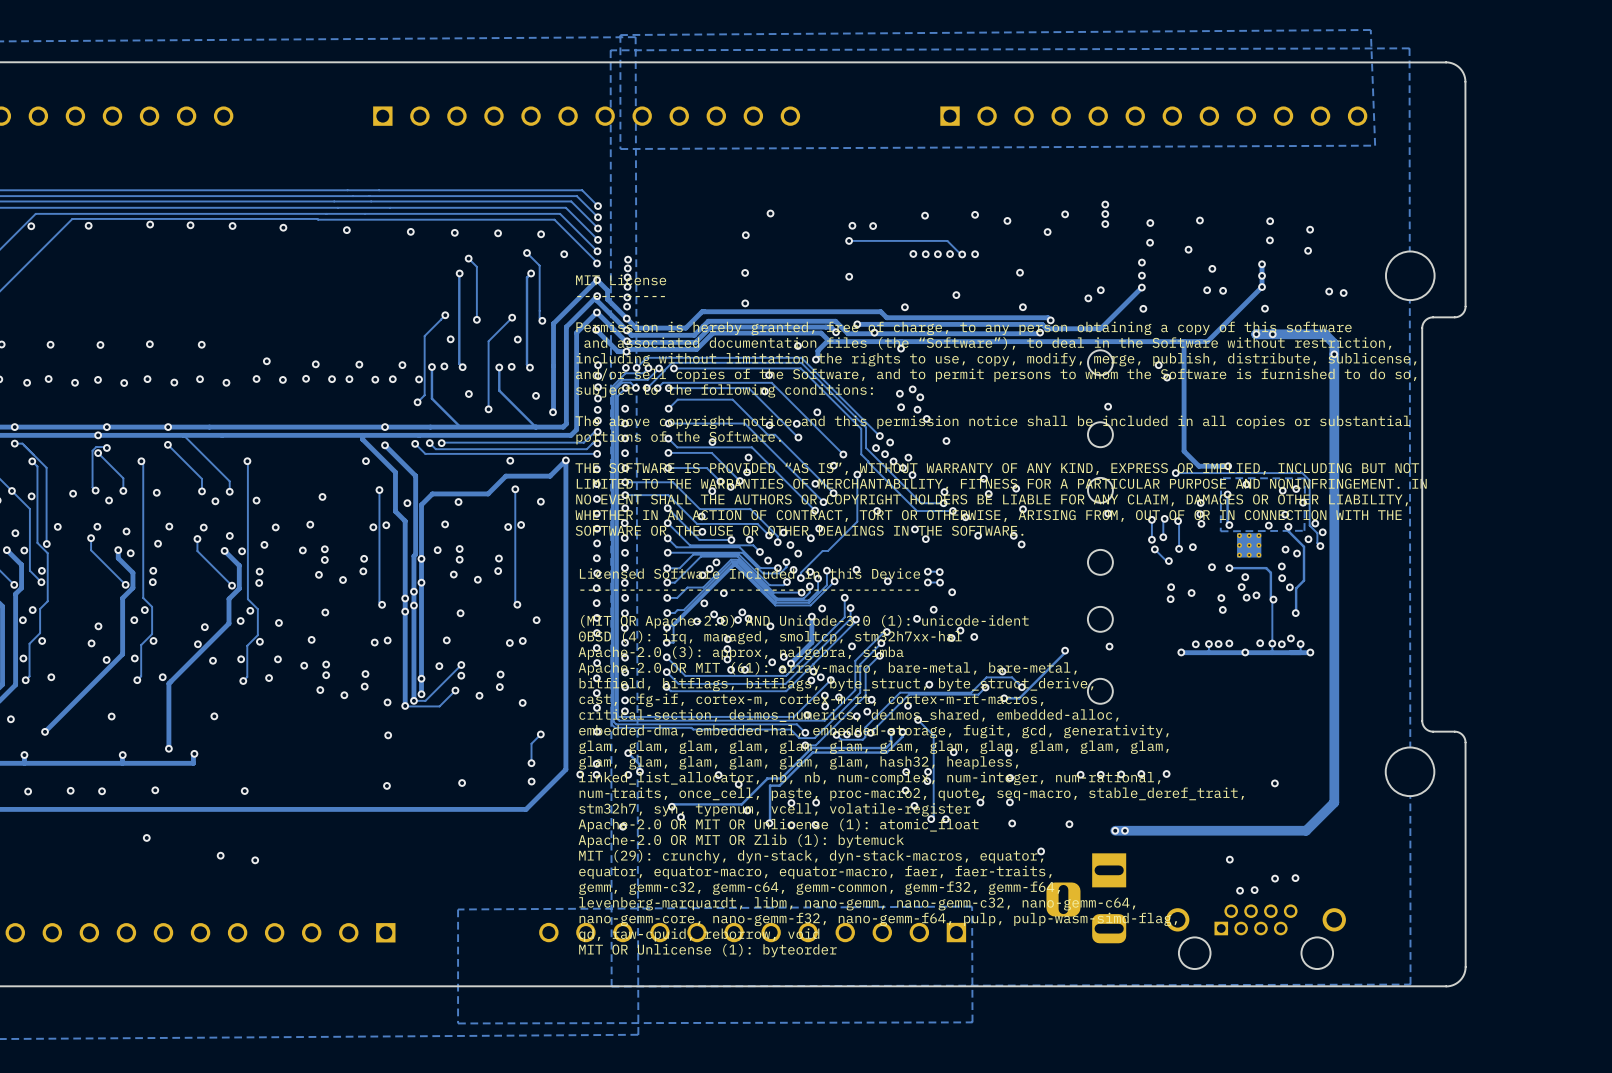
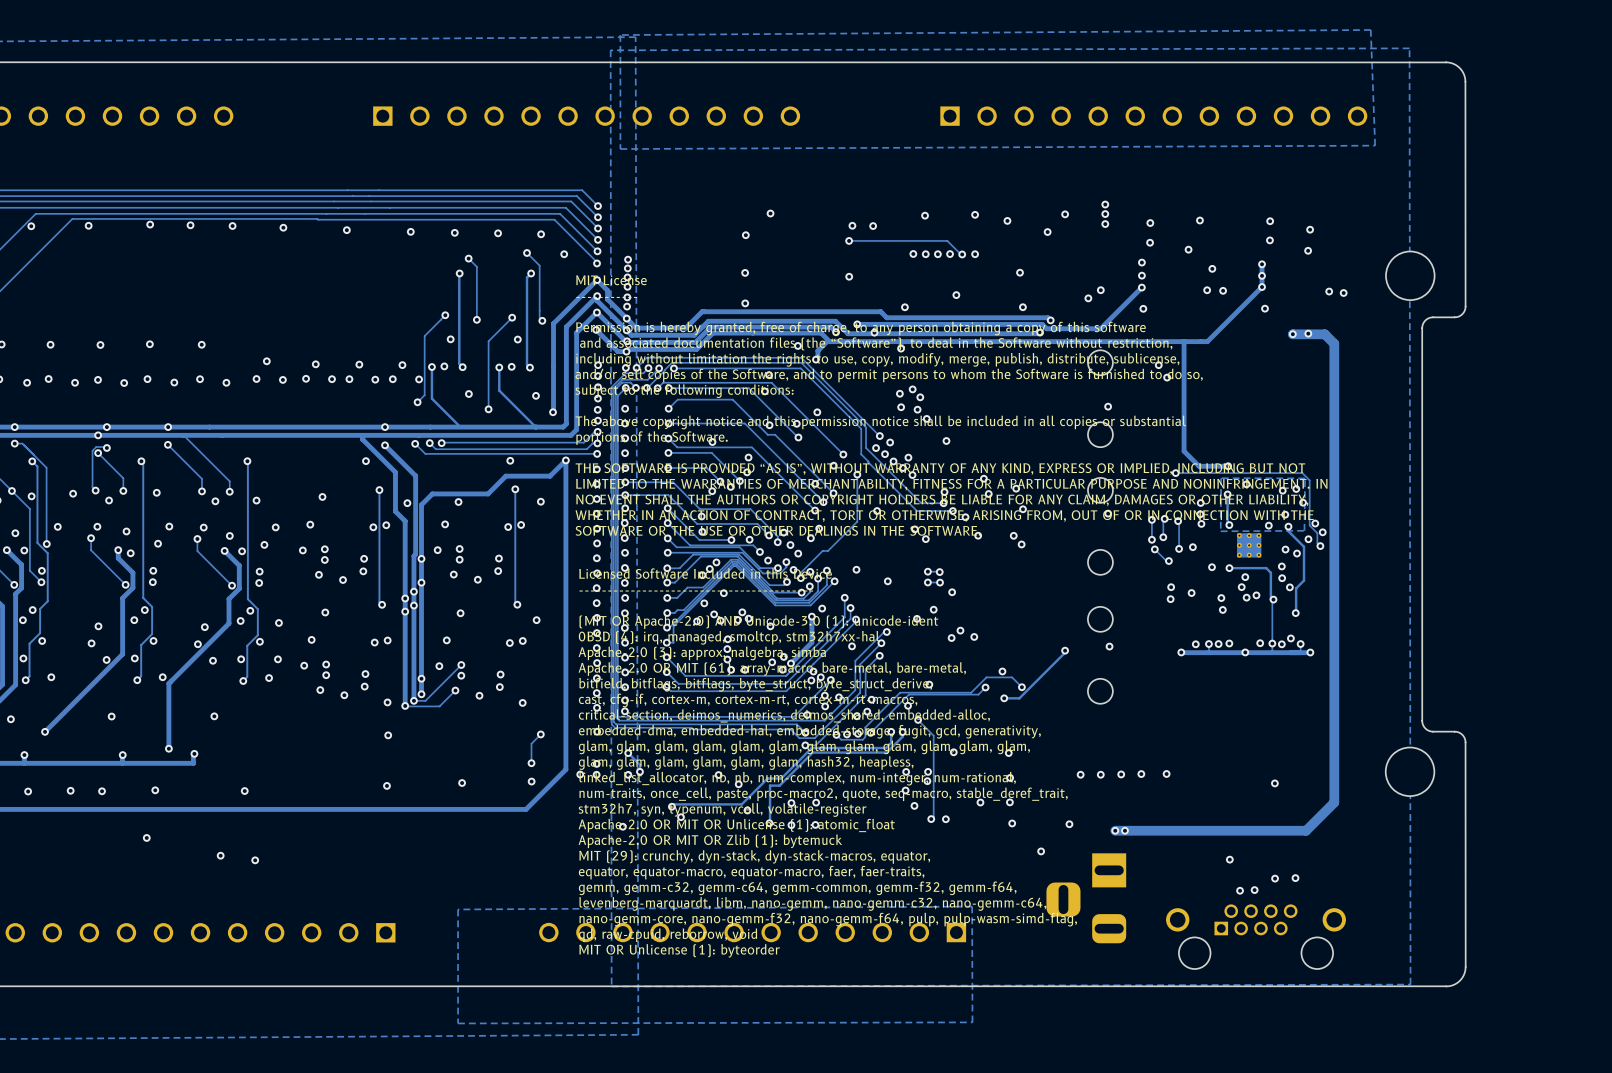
via: none -> (1308, 333)
via: (1256, 334) -> none
via: (1272, 334) -> none
track: (1292, 334) (1256, 334) -> none
via: none -> (1292, 334)
via: (1334, 354) -> none

